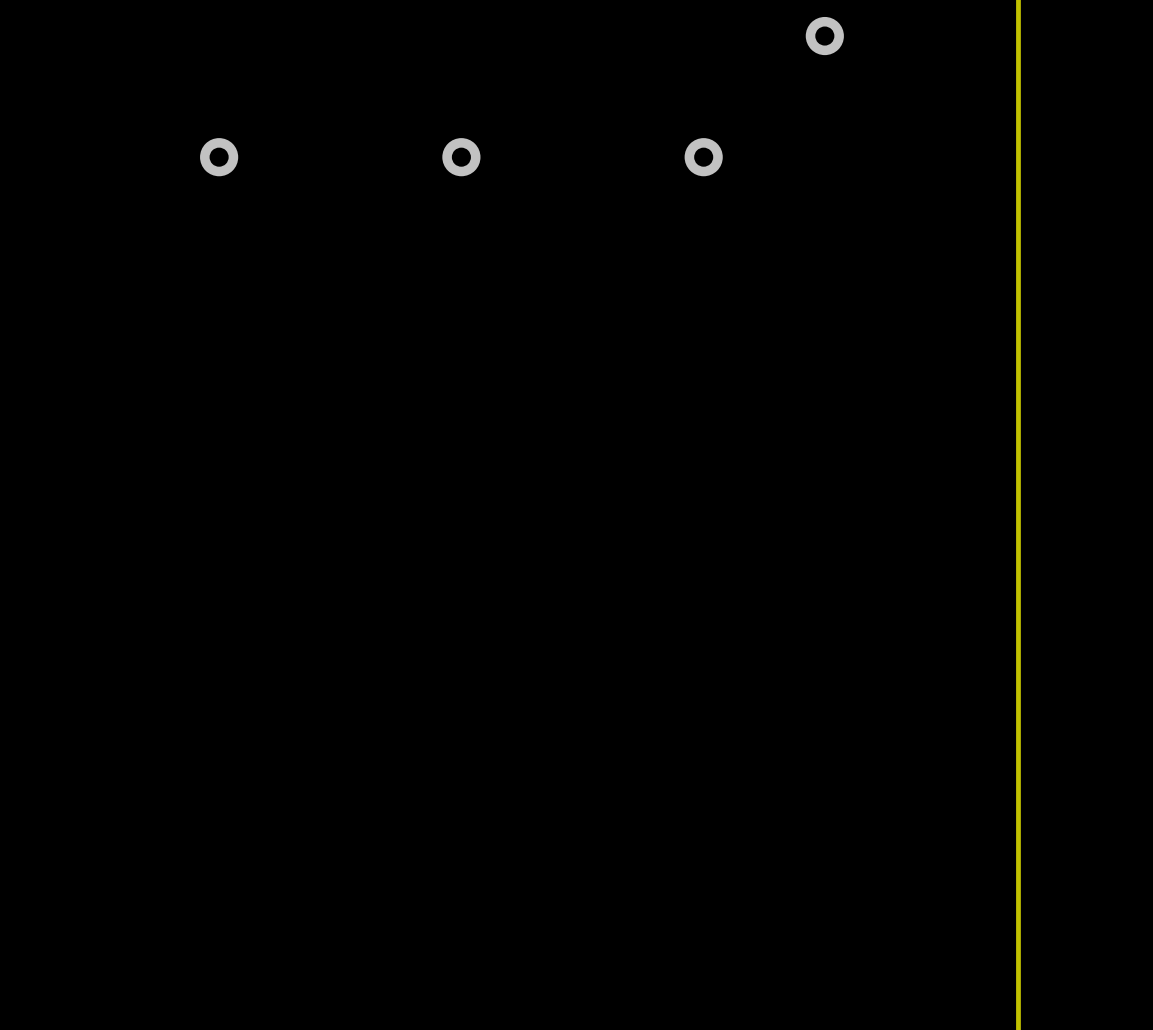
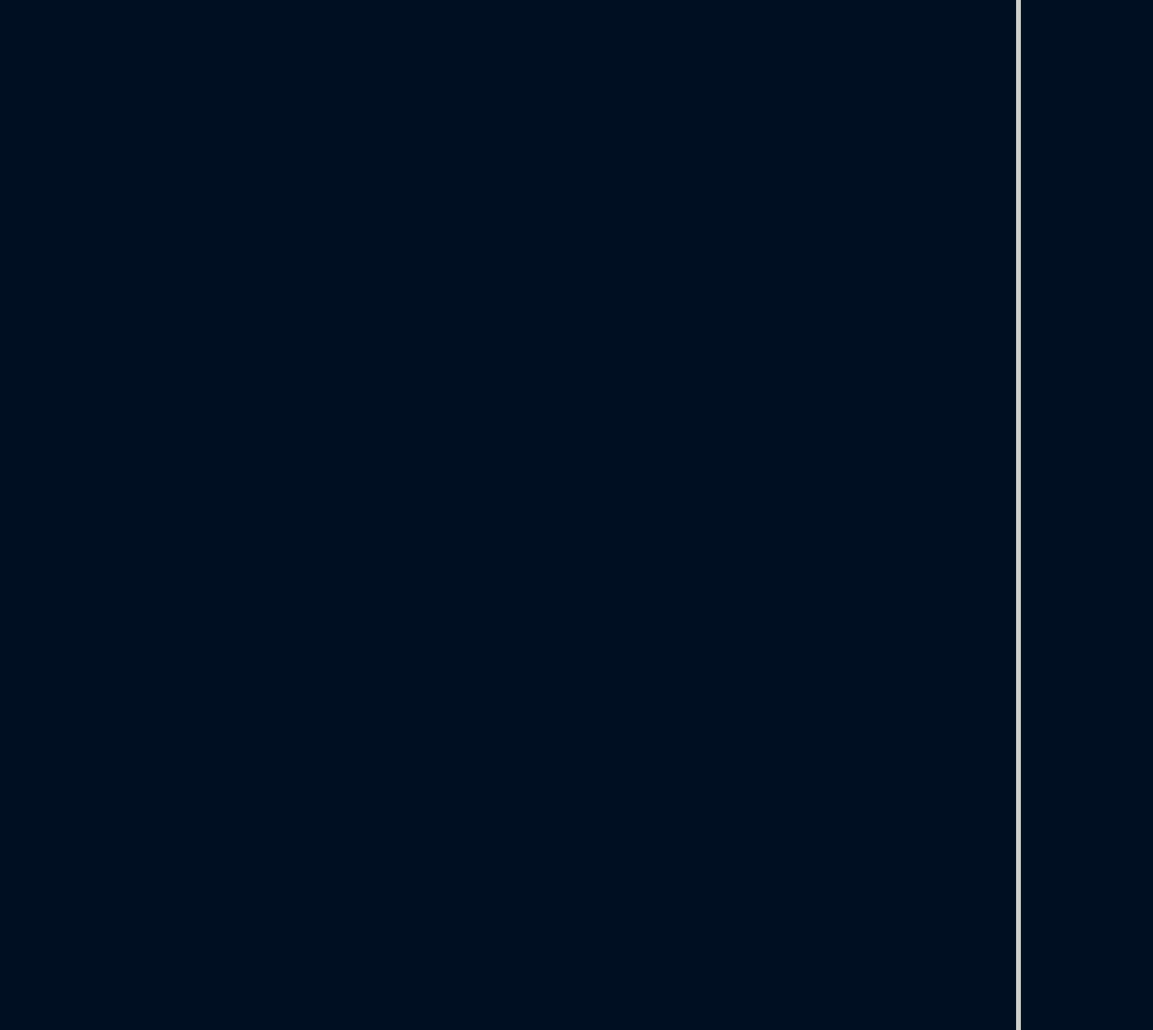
via: (824, 36) -> none
via: (219, 157) -> none
via: (461, 157) -> none
via: (703, 157) -> none

